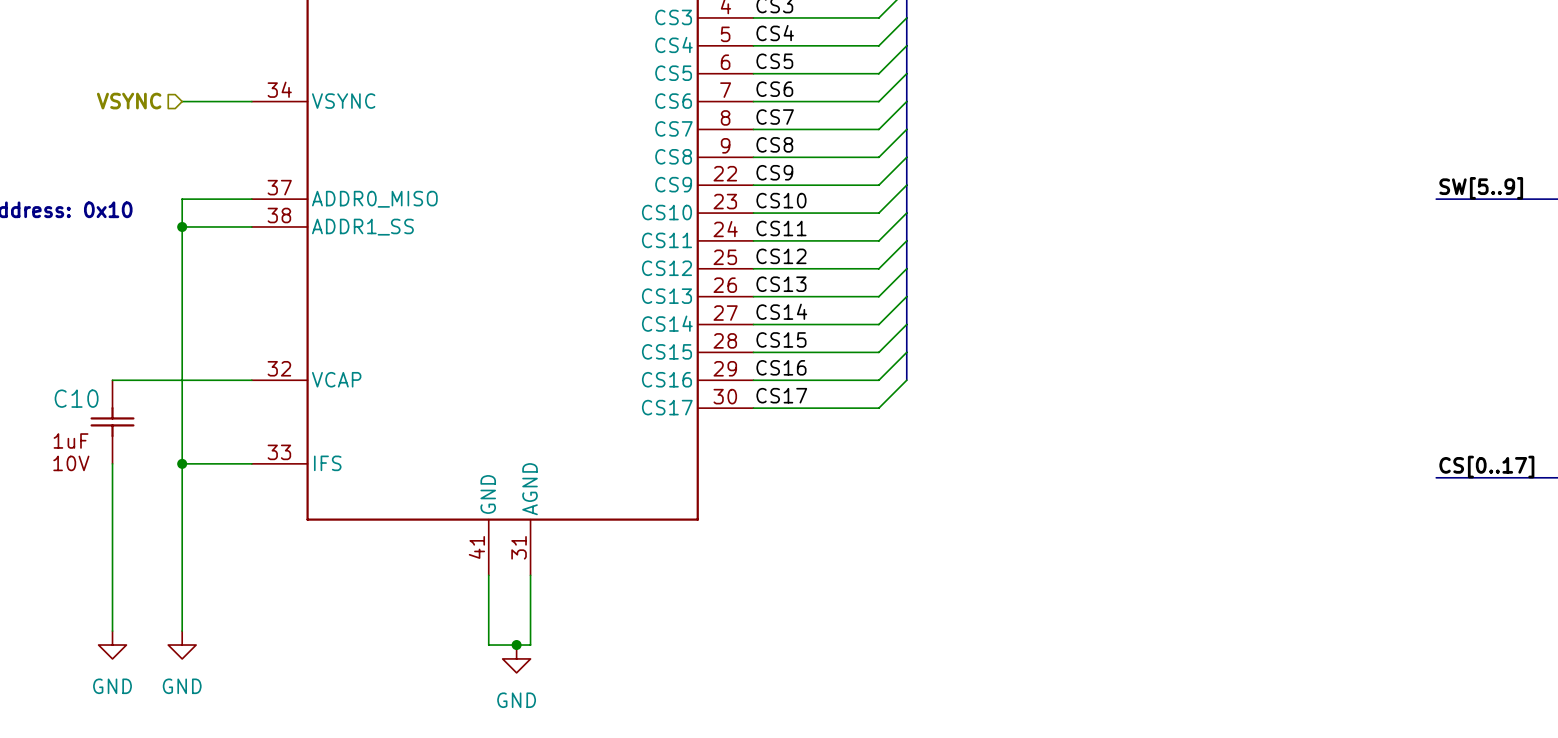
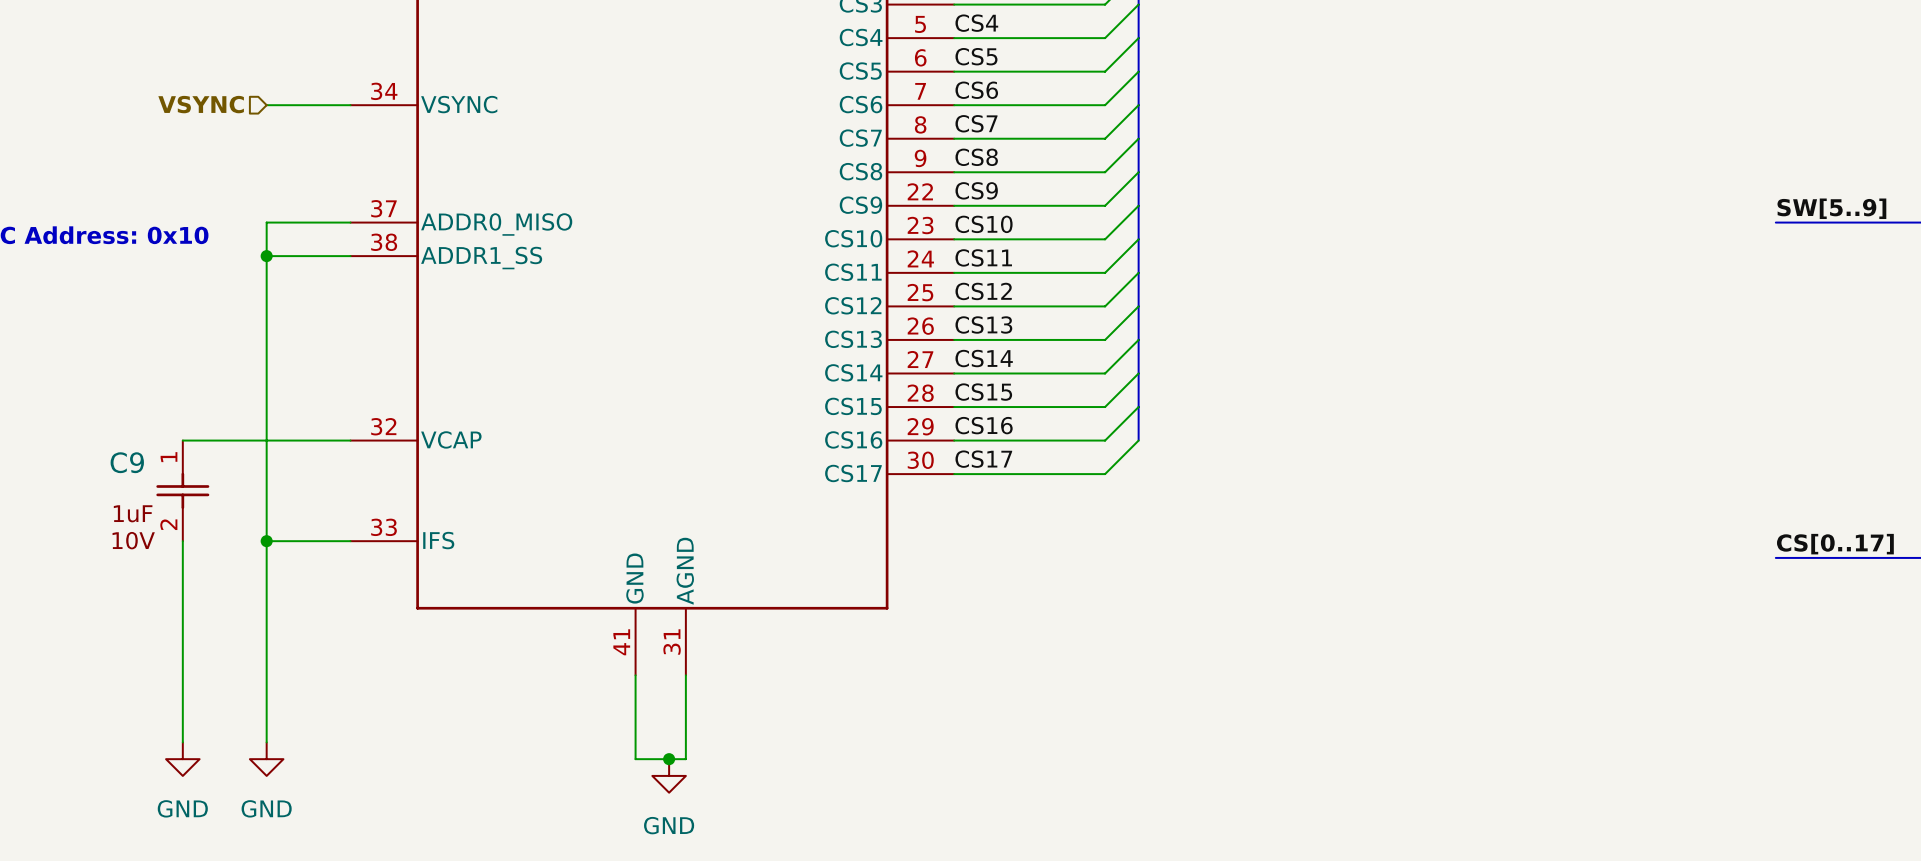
C10 pin number: none -> 1 (168, 457)
C10 name: C10 (76, 398) -> C9 (127, 462)
C10 pin number: none -> 2 (168, 524)

